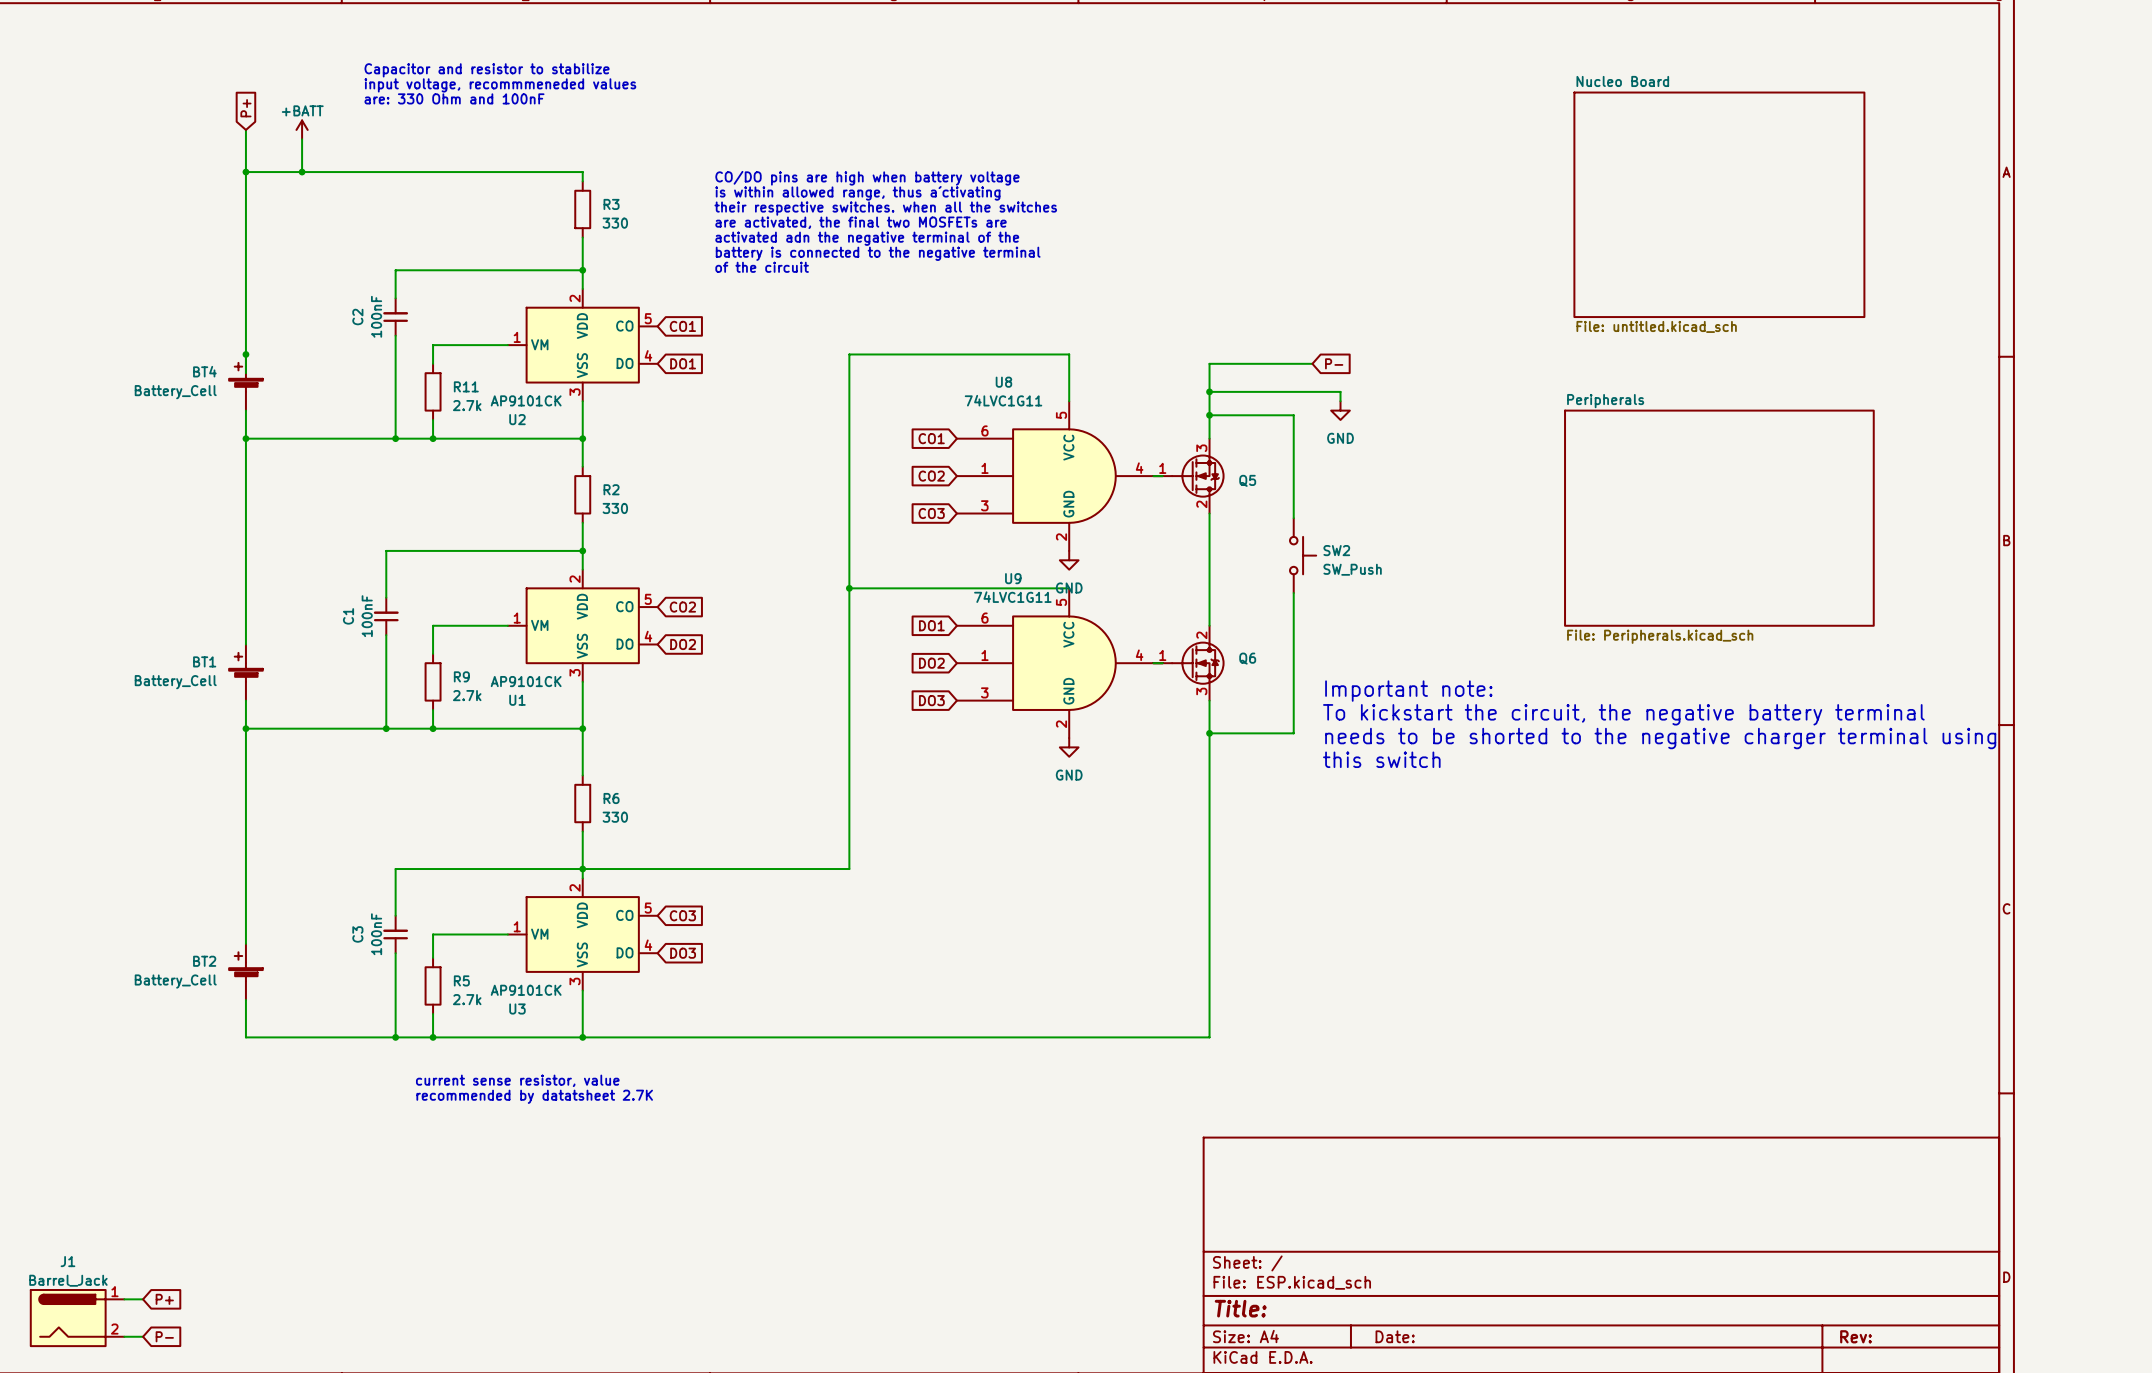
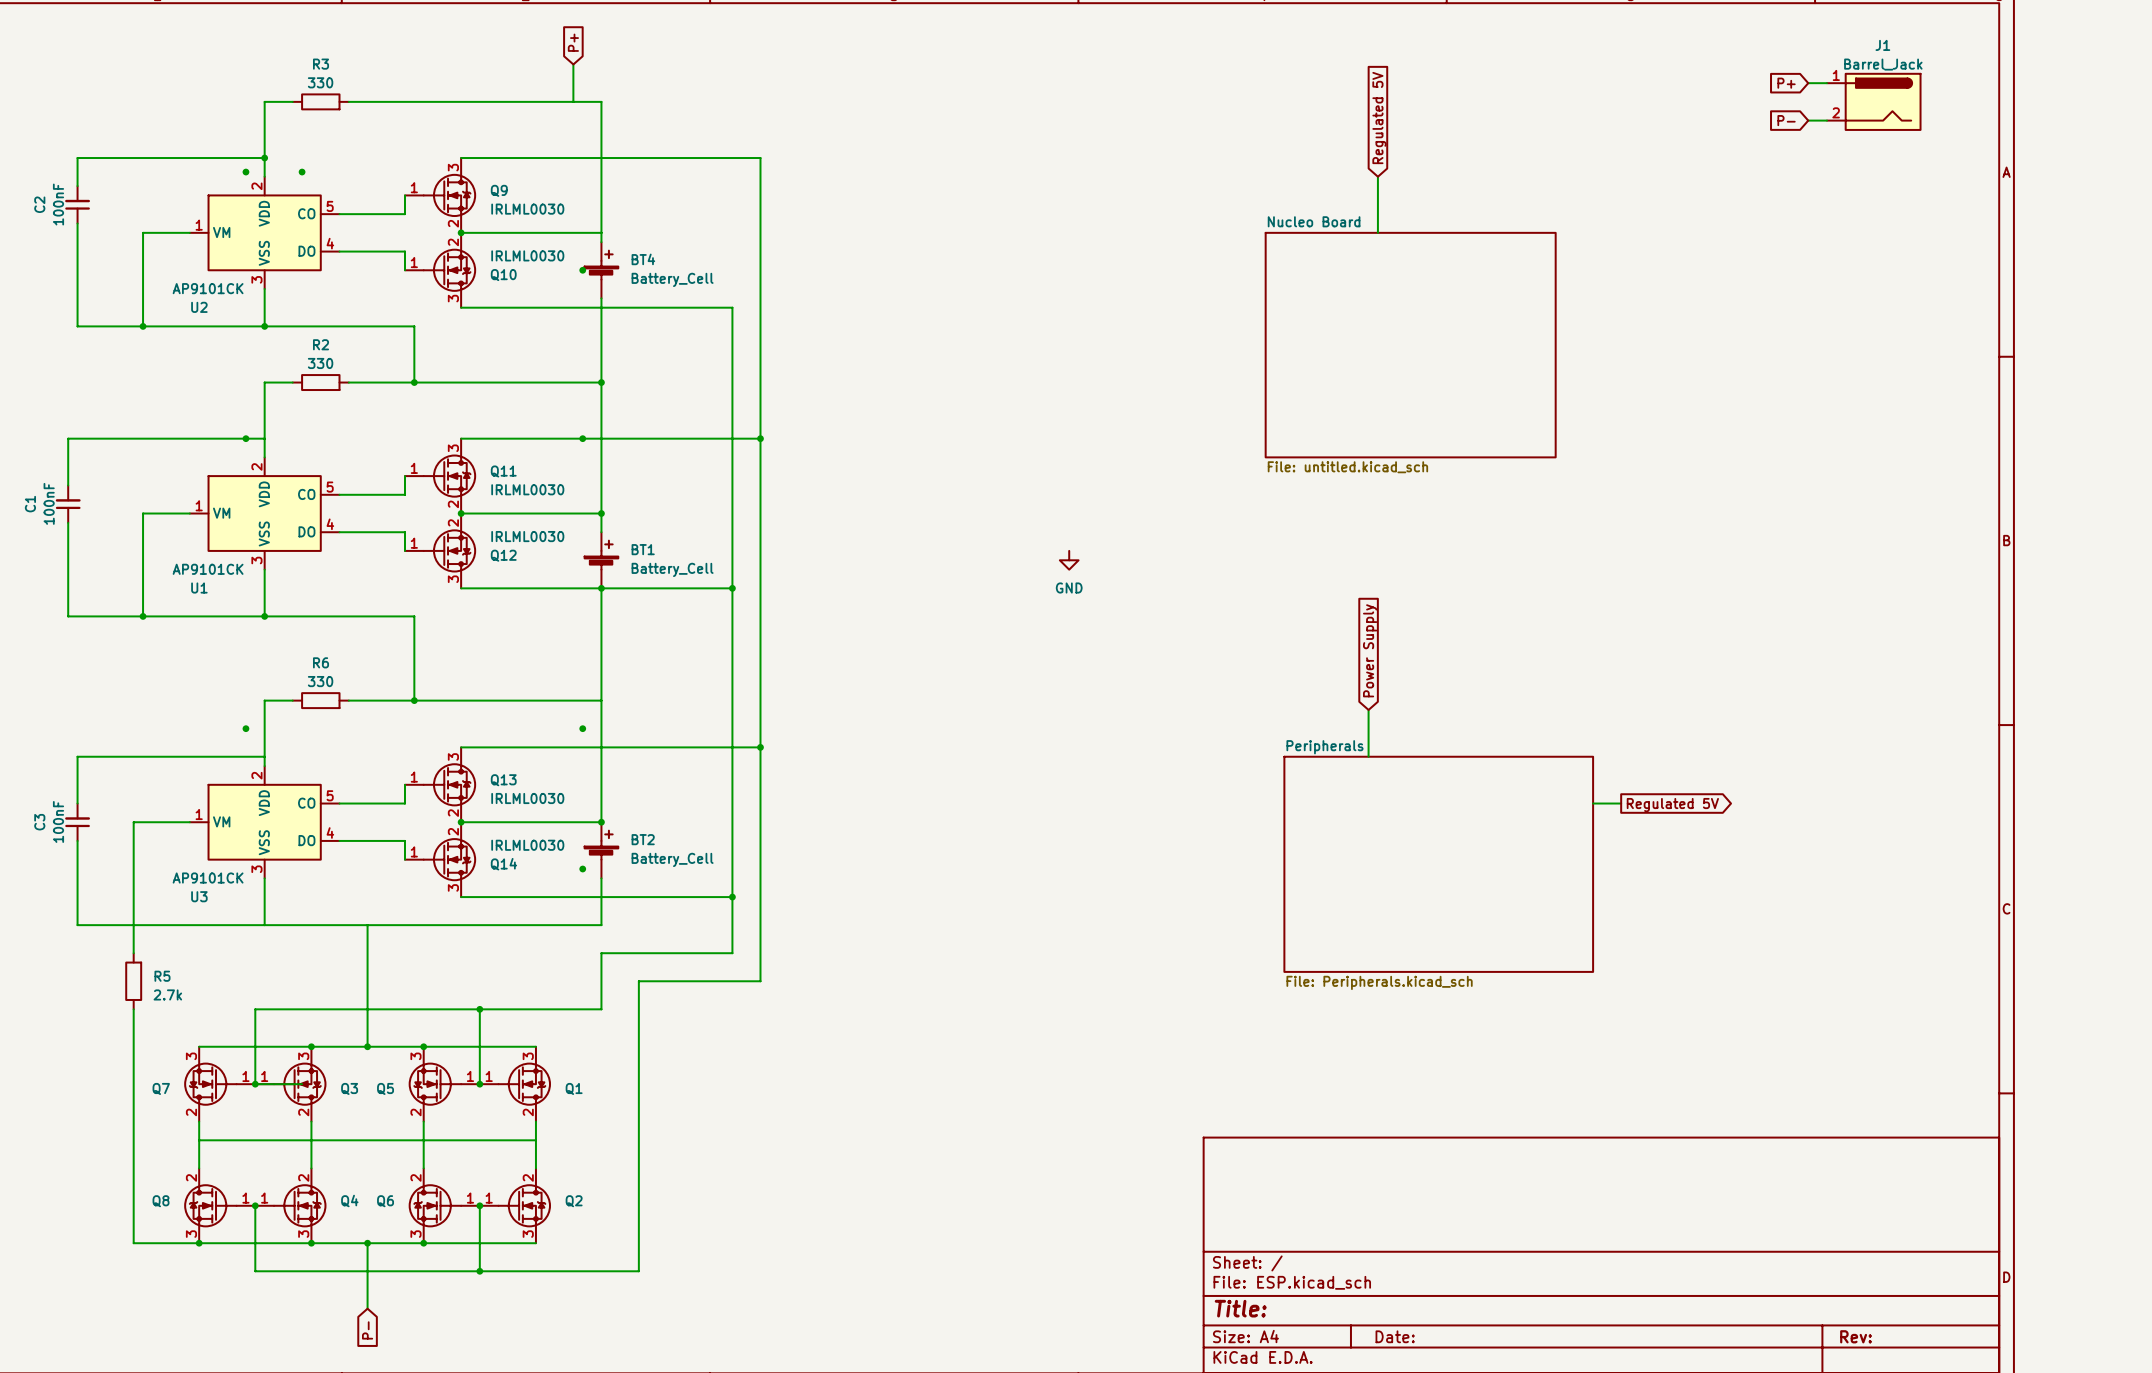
global label: none -> P+ (573, 42)
wire: none -> (573, 64) (573, 101)
text: Capacitor and resistor to stabilize (487, 70) -> none
global label: none -> P+ (1786, 83)
wire: none -> (1808, 83) (1826, 83)
text: input voltage, recommmeneded values (500, 85) -> none
text: are: 330 Ohm and 100nF (454, 98) -> none
wire: none -> (292, 101) (264, 101) (264, 176)
wire: none -> (348, 101) (601, 101) (601, 242)
global label: P+ (245, 108) -> none
global label: none -> Regulated 5V (1379, 118)
global label: none -> P- (1786, 120)
wire: none -> (1808, 120) (1826, 120)
wire: (245, 129) (245, 373) -> none
power symbol: +BATT (302, 129) -> none
wire: (302, 139) (302, 172) -> none
wire: none -> (264, 158) (77, 158) (77, 186)
junction: none -> (264, 158)
wire: none -> (461, 158) (760, 158) (760, 981) (638, 981) (638, 1271) (255, 1271) (255, 1205)
wire: (245, 172) (582, 172) (582, 181) -> none
wire: none -> (1377, 176) (1377, 232)
text: CO/DO pins are high when battery voltage (867, 178) -> none
text: is within allowed range, thus a´ctivating (857, 193) -> none
wire: none -> (404, 195) (404, 214) (339, 214)
Q9: none -> IRLML0030 (440, 195)
R3 name position: R3 (611, 204) -> R3 (321, 64)
sheet Nucleo Board: File: untitled.kicad_sch (1719, 204) -> none
text: their respective switches. when all the switches (885, 208) -> none
R3 rotation: 0° (582, 209) -> 90° clockwise (320, 101)
R3 position: (582, 209) -> (320, 101)
text: are activated, the final two MOSFETs are (861, 222) -> none
wire: none -> (77, 223) (77, 326) (414, 326) (414, 382)
R3 value position: 330 (615, 223) -> 330 (320, 82)
wire: none -> (189, 232) (143, 232) (143, 326)
wire: none -> (461, 232) (601, 232)
junction: none -> (461, 232)
wire: (582, 237) (582, 288) -> none
text: activated adn the negative terminal of the (867, 238) -> none
wire: none -> (339, 251) (404, 251) (404, 270)
text: battery is connected to the negative terminal (878, 253) -> none
text: of the circuit (762, 267) -> none
Q10: none -> IRLML0030 (440, 270)
wire: (582, 270) (395, 270) (395, 298) -> none
wire: none -> (264, 288) (264, 326)
wire: none -> (601, 298) (601, 532)
wire: none -> (461, 307) (732, 307) (732, 953) (601, 953) (601, 1009) (255, 1009) (255, 1084) (302, 1084)
C2 position: (395, 317) -> (77, 204)
junction: none -> (143, 326)
global label: CO1 (682, 326) -> none
wire: (395, 335) (395, 438) -> none
wire: (507, 345) (433, 345) (433, 363) -> none
U2 position: (582, 345) -> (264, 232)
sheet Nucleo Board: none -> File: untitled.kicad_sch (1410, 345)
junction position: (245, 354) -> (264, 326)
global label: DO1 (683, 363) -> none
wire: (1312, 363) (1209, 363) (1209, 438) -> none
global label: P- (1334, 363) -> none
BT4 flip: as is (245, 376) -> left-right (601, 264)
BT4 position: (245, 382) -> (601, 270)
wire: none -> (292, 382) (264, 382) (264, 457)
wire: none -> (348, 382) (601, 382)
junction: none -> (414, 382)
junction: none -> (601, 382)
R11: 2.7k (433, 391) -> none
wire: (1209, 391) (1340, 391) (1340, 401) -> none
junction: (1209, 391) -> none
wire: (582, 401) (582, 466) -> none
wire: (1069, 401) (1069, 354) (849, 354) (849, 869) (395, 869) (395, 915) -> none
wire: (245, 410) (245, 644) -> none
power symbol: GND (1340, 410) -> none
wire: (1209, 415) (1293, 415) (1293, 518) -> none
junction: (1209, 415) -> none
wire: (433, 419) (433, 438) -> none
wire: none -> (245, 438) (68, 438) (68, 485)
wire: (264, 438) (461, 438) -> none
junction: (395, 438) -> none
junction: (433, 438) -> none
wire: none -> (582, 438) (760, 438)
junction: none -> (760, 438)
global label: CO1 (931, 438) -> none
wire: none -> (404, 476) (404, 494) (339, 494)
Q11: none -> IRLML0030 (440, 476)
global label: CO2 (931, 476) -> none
U8: 74LVC1G11 (1059, 476) -> none
wire: (1153, 476) (1162, 476) -> none
Q5 position: (1188, 476) -> (444, 1084)
Q5 flip: as is (1198, 476) -> left-right (434, 1084)
R2 name position: R2 (611, 489) -> R2 (321, 344)
R2 rotation: 0° (582, 494) -> 90° clockwise (320, 382)
R2 position: (582, 494) -> (320, 382)
R2 value position: 330 (615, 508) -> 330 (320, 363)
wire: none -> (189, 513) (143, 513) (143, 616)
wire: none -> (461, 513) (601, 513)
junction: none -> (461, 513)
junction: none -> (601, 513)
global label: CO3 (931, 513) -> none
wire: (1209, 513) (1209, 625) -> none
sheet Peripherals: File: Peripherals.kicad_sch (1719, 518) -> none
wire: none -> (68, 522) (68, 616) (414, 616) (414, 700)
wire: (582, 522) (582, 569) -> none
wire: none -> (339, 532) (404, 532) (404, 550)
Q12: none -> IRLML0030 (440, 550)
wire: (582, 550) (386, 550) (386, 597) -> none
junction: (582, 550) -> none
SW2: SW_Push (1303, 555) -> none
wire: none -> (264, 569) (264, 616)
wire: none -> (461, 588) (732, 588)
wire: none -> (601, 588) (601, 822) (461, 822)
junction: none -> (601, 588)
junction: none -> (732, 588)
wire: (849, 588) (1069, 588) -> none
junction: (849, 588) -> none
wire: (1293, 593) (1293, 733) (1209, 733) -> none
global label: CO2 (682, 607) -> none
junction: none -> (143, 616)
junction: none -> (264, 616)
C1 position: (386, 616) -> (68, 504)
wire: (507, 625) (433, 625) (433, 653) -> none
U1 position: (582, 625) -> (264, 513)
global label: DO1 (931, 625) -> none
wire: (386, 635) (386, 728) -> none
global label: DO2 (683, 644) -> none
global label: none -> Power Supply (1370, 650)
global label: DO2 (931, 663) -> none
U9: 74LVC1G11 (1059, 663) -> none
wire: (1153, 663) (1162, 663) -> none
Q6 position: (1188, 663) -> (444, 1205)
Q6 flip: as is (1198, 663) -> left-right (434, 1205)
BT1 flip: as is (245, 666) -> left-right (601, 554)
BT1 position: (245, 672) -> (601, 560)
R9: 2.7k (433, 681) -> none
wire: (582, 681) (582, 775) -> none
text: Important note: (1408, 691) -> none
wire: (245, 700) (245, 943) -> none
wire: none -> (292, 700) (264, 700) (264, 766)
wire: none -> (348, 700) (601, 700)
junction: none -> (414, 700)
global label: DO3 (931, 700) -> none
wire: (1209, 700) (1209, 1037) (245, 1037) (245, 999) -> none
wire: (433, 709) (433, 728) -> none
wire: none -> (1368, 709) (1368, 756)
text: To kickstart the circuit, the negative battery terminal (1623, 714) -> none
wire: (245, 728) (582, 728) -> none
junction: (386, 728) -> none
junction: (433, 728) -> none
junction: (1209, 733) -> none
text: needs to be shorted to the negative charger terminal using (1660, 738) -> none
wire: none -> (461, 747) (760, 747)
junction: none -> (760, 747)
power symbol: GND (1069, 747) -> none
wire: none -> (264, 756) (77, 756) (77, 803)
text: this switch (1381, 759) -> none
wire: none -> (404, 784) (404, 803) (339, 803)
Q13: none -> IRLML0030 (440, 784)
R6 name position: R6 (611, 798) -> R6 (321, 662)
R6 rotation: 0° (582, 803) -> 90° clockwise (320, 700)
R6 position: (582, 803) -> (320, 700)
wire: none -> (1593, 803) (1621, 803)
global label: none -> Regulated 5V (1672, 805)
R6 value position: 330 (615, 817) -> 330 (320, 681)
wire: none -> (189, 822) (133, 822) (133, 953)
junction: none -> (461, 822)
junction: none -> (601, 822)
wire: (582, 831) (582, 878) -> none
wire: none -> (77, 840) (77, 925) (601, 925) (601, 878)
wire: none -> (339, 840) (404, 840) (404, 859)
Q14: none -> IRLML0030 (440, 859)
sheet Peripherals: none -> File: Peripherals.kicad_sch (1438, 864)
wire: none -> (264, 878) (264, 925)
wire: none -> (461, 897) (732, 897)
junction: none -> (732, 897)
global label: CO3 (682, 915) -> none
wire: none -> (367, 925) (367, 1046)
C3 position: (395, 934) -> (77, 822)
wire: (507, 934) (433, 934) (433, 957) -> none
U3 position: (582, 934) -> (264, 822)
wire: (395, 953) (395, 1037) -> none
global label: DO3 (683, 953) -> none
BT2 flip: as is (245, 966) -> left-right (601, 844)
BT2 position: (245, 971) -> (601, 850)
R5 position: (433, 985) -> (133, 981)
wire: (582, 990) (582, 1037) -> (535, 1121) (535, 1168)
wire: none -> (133, 1009) (133, 1243) (535, 1243)
wire: none -> (479, 1009) (479, 1084)
junction: none -> (479, 1009)
wire: (433, 1014) (433, 1037) -> none
junction: (395, 1037) -> none
junction position: (433, 1037) -> (423, 1046)
junction: (582, 1037) -> none
wire: none -> (199, 1046) (535, 1046)
junction: none -> (311, 1046)
junction: none -> (367, 1046)
text: current sense resistor, value (517, 1080) -> none
Q7: none -> (219, 1084)
junction: none -> (255, 1084)
Q3: none -> (290, 1084)
junction: none -> (479, 1084)
Q1: none -> (515, 1084)
text: recommended by datatsheet 2.7K (534, 1096) -> none
wire: none -> (199, 1121) (199, 1168)
wire: none -> (311, 1121) (311, 1168)
wire: none -> (423, 1121) (423, 1168)
wire: none -> (199, 1140) (535, 1140)
Q8: none -> (219, 1205)
junction: none -> (255, 1205)
Q4: none -> (290, 1205)
wire: none -> (479, 1205) (479, 1271)
junction: none -> (479, 1205)
Q2: none -> (515, 1205)
junction: none -> (199, 1243)
junction: none -> (311, 1243)
wire: none -> (367, 1243) (367, 1308)
junction: none -> (367, 1243)
junction: none -> (423, 1243)
junction: none -> (479, 1271)
wire: (124, 1299) (143, 1299) -> none
global label: P+ (164, 1299) -> none
J1 flip: as is (68, 1318) -> left-right (1883, 101)
J1 position: (77, 1318) -> (1874, 101)
global label: none -> P- (367, 1330)
wire: (124, 1336) (143, 1336) -> none
global label: P- (164, 1336) -> none

